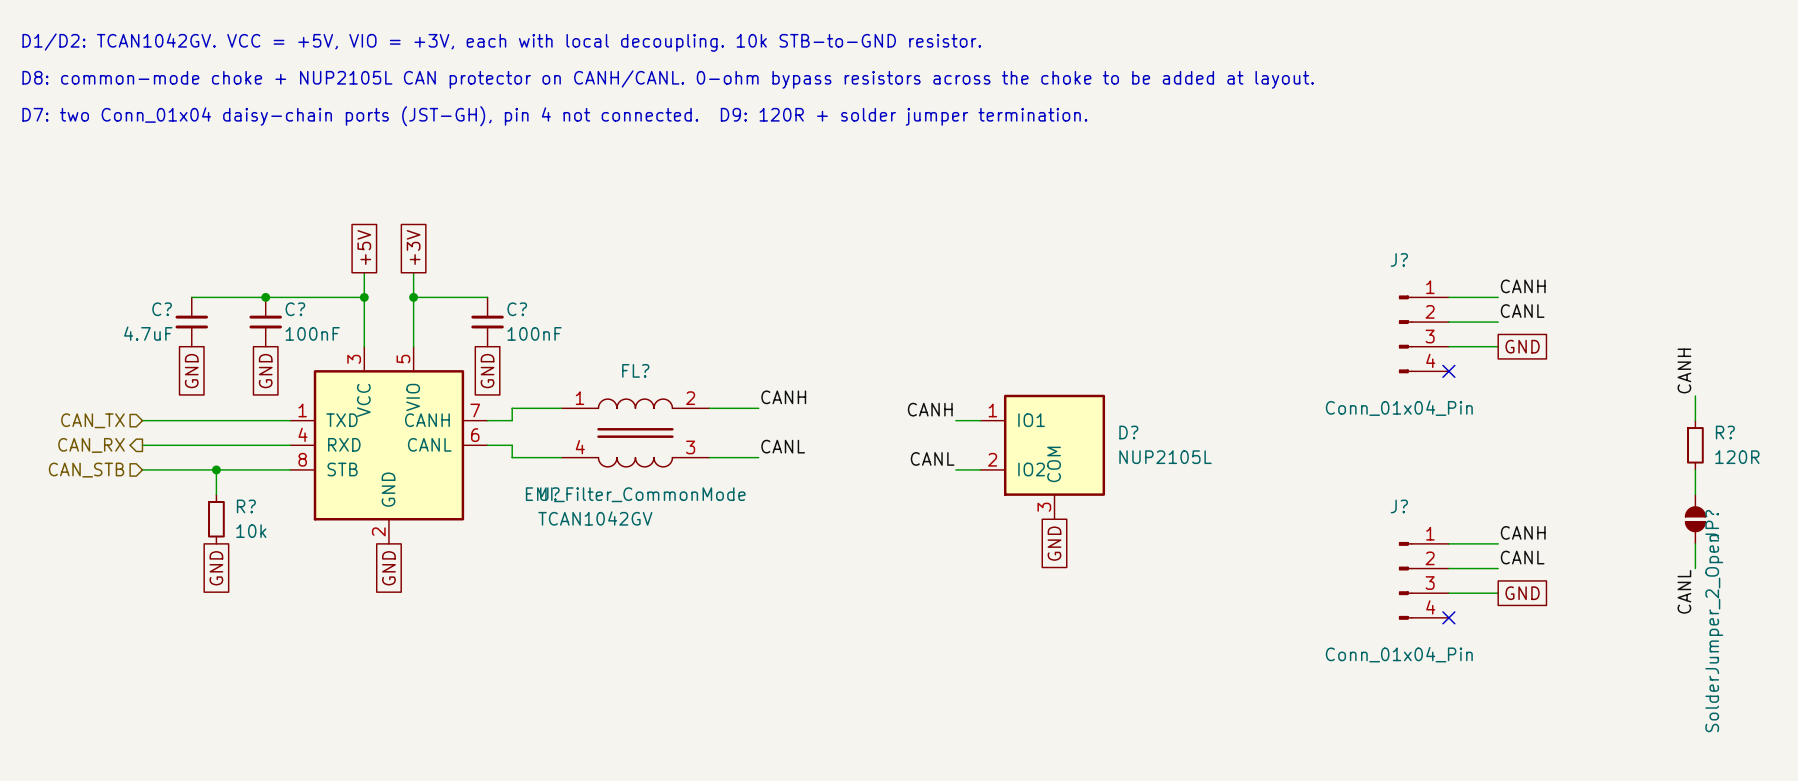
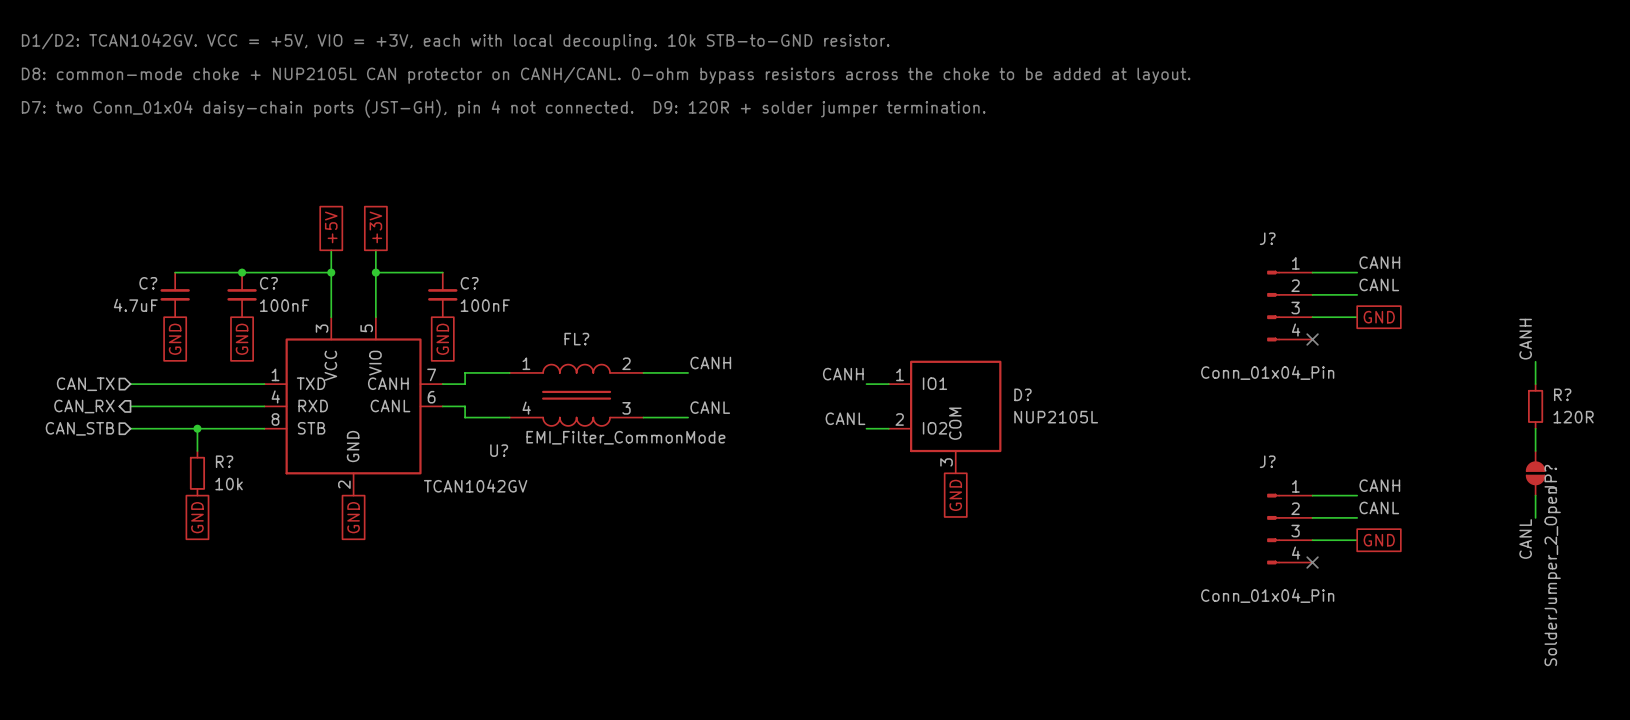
FL? value position: EMI_Filter_CommonMode (635, 494) -> EMI_Filter_CommonMode (625, 437)
U? value position: TCAN1042GV (595, 518) -> TCAN1042GV (475, 486)

